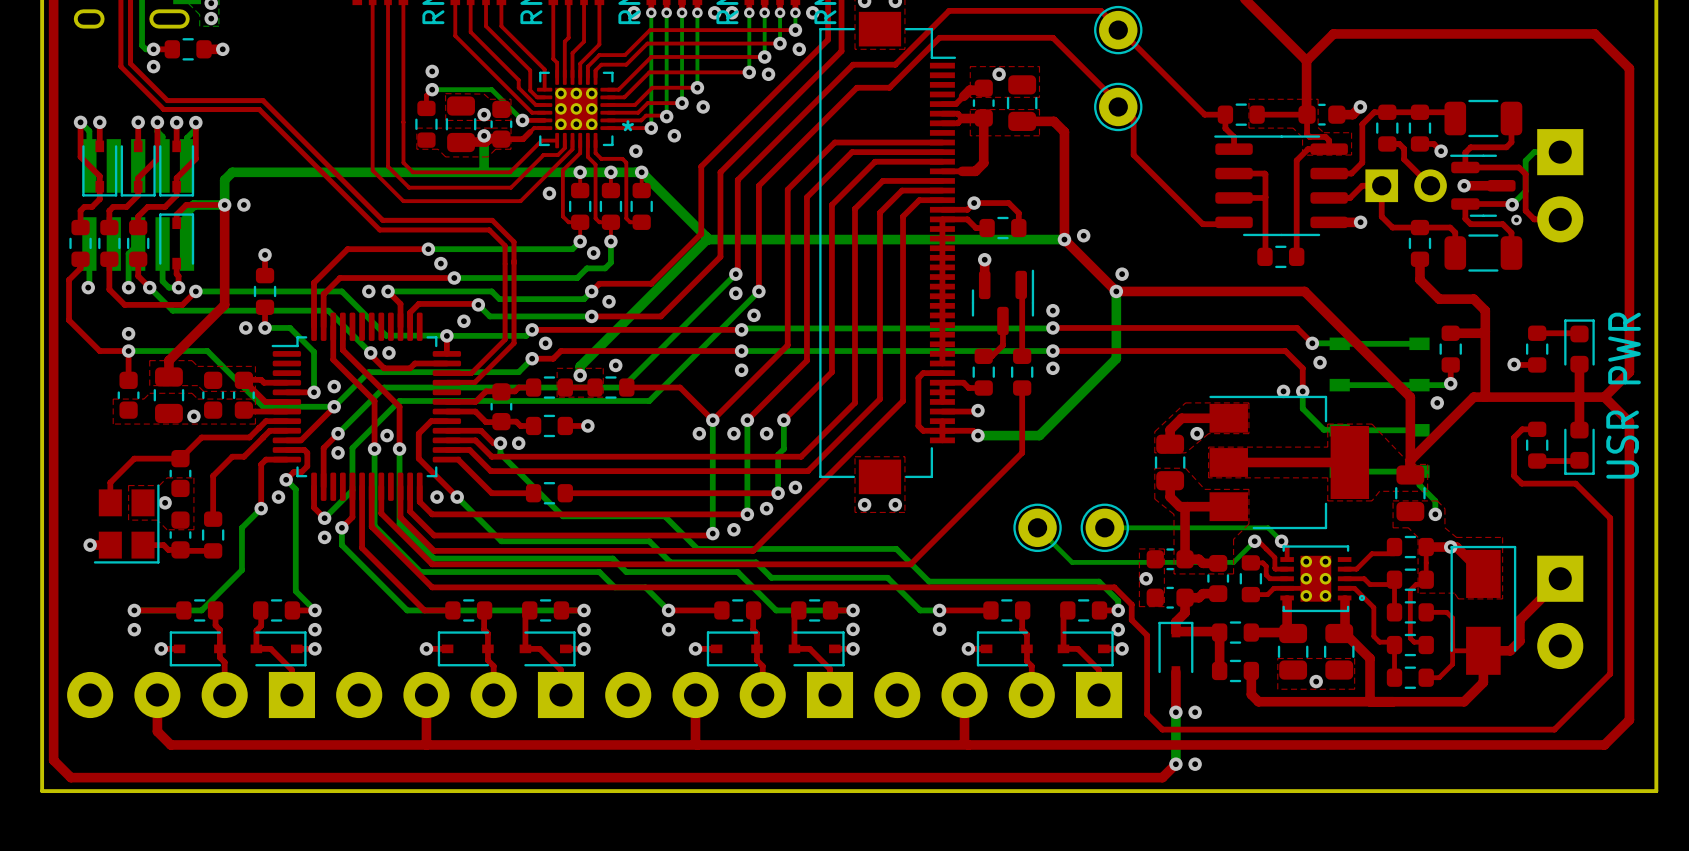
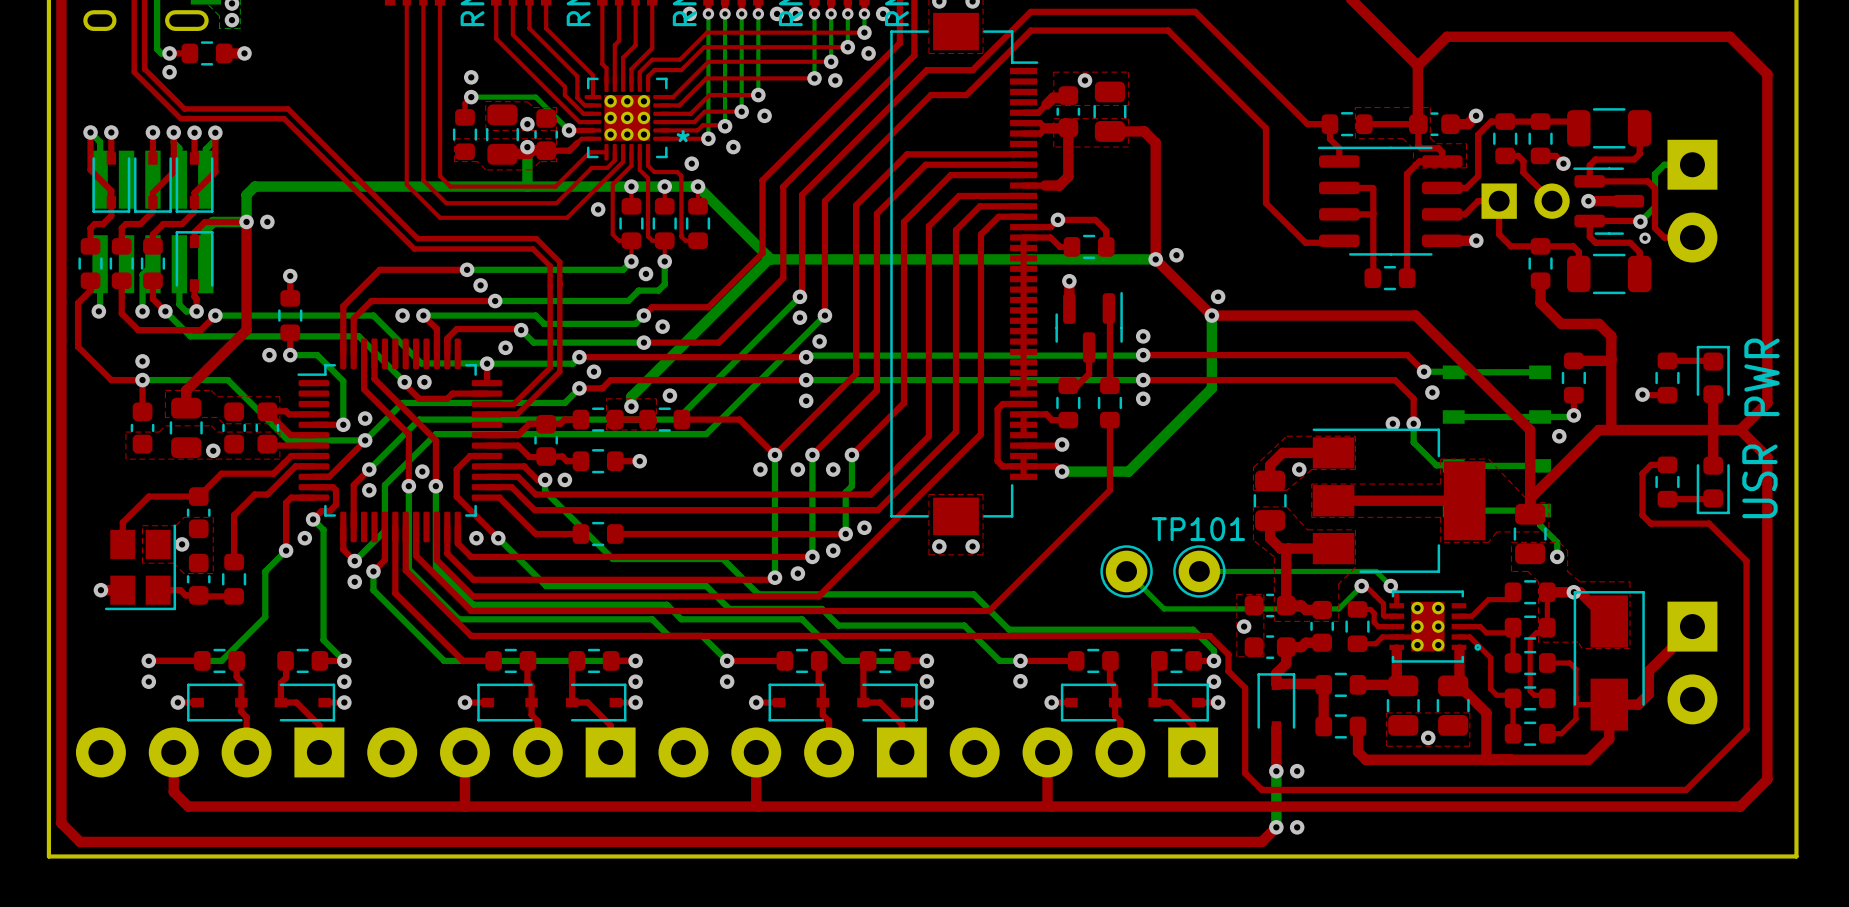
part: (1118, 30) -> none
top track: (939, 37) (1052, 37) (1133, 118) (1133, 155) (1166, 187) -> (1020, 40) (1030, 30) (1168, 30) (1265, 128) (1265, 203)
part: (1118, 106) -> none
TP101 name: none -> TP101 (1198, 529)

